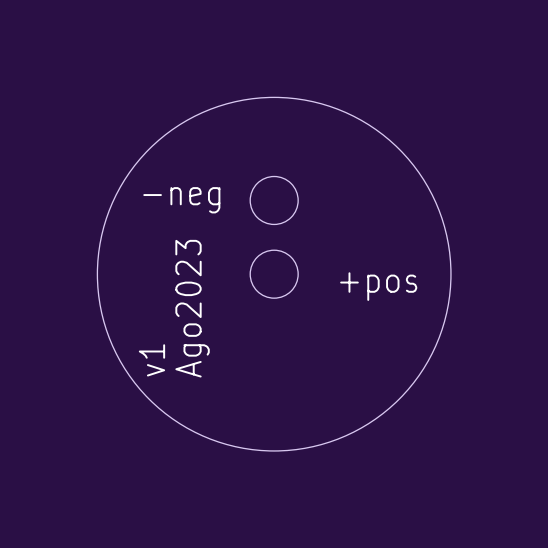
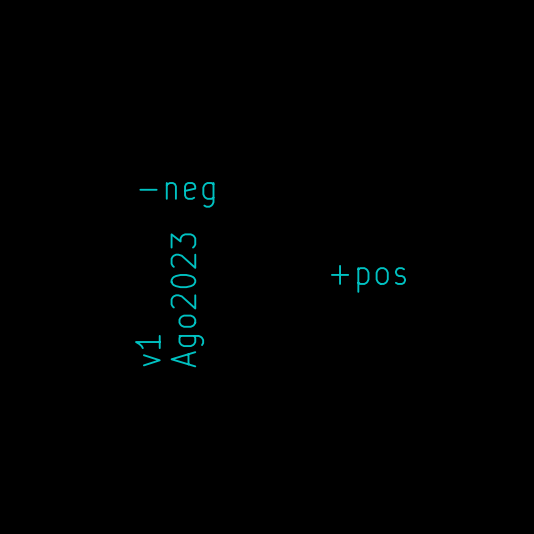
round board edge: [97, 97, 452, 452] -> none
round board edge: [250, 176, 299, 225] -> none
round board edge: [250, 250, 299, 299] -> none

